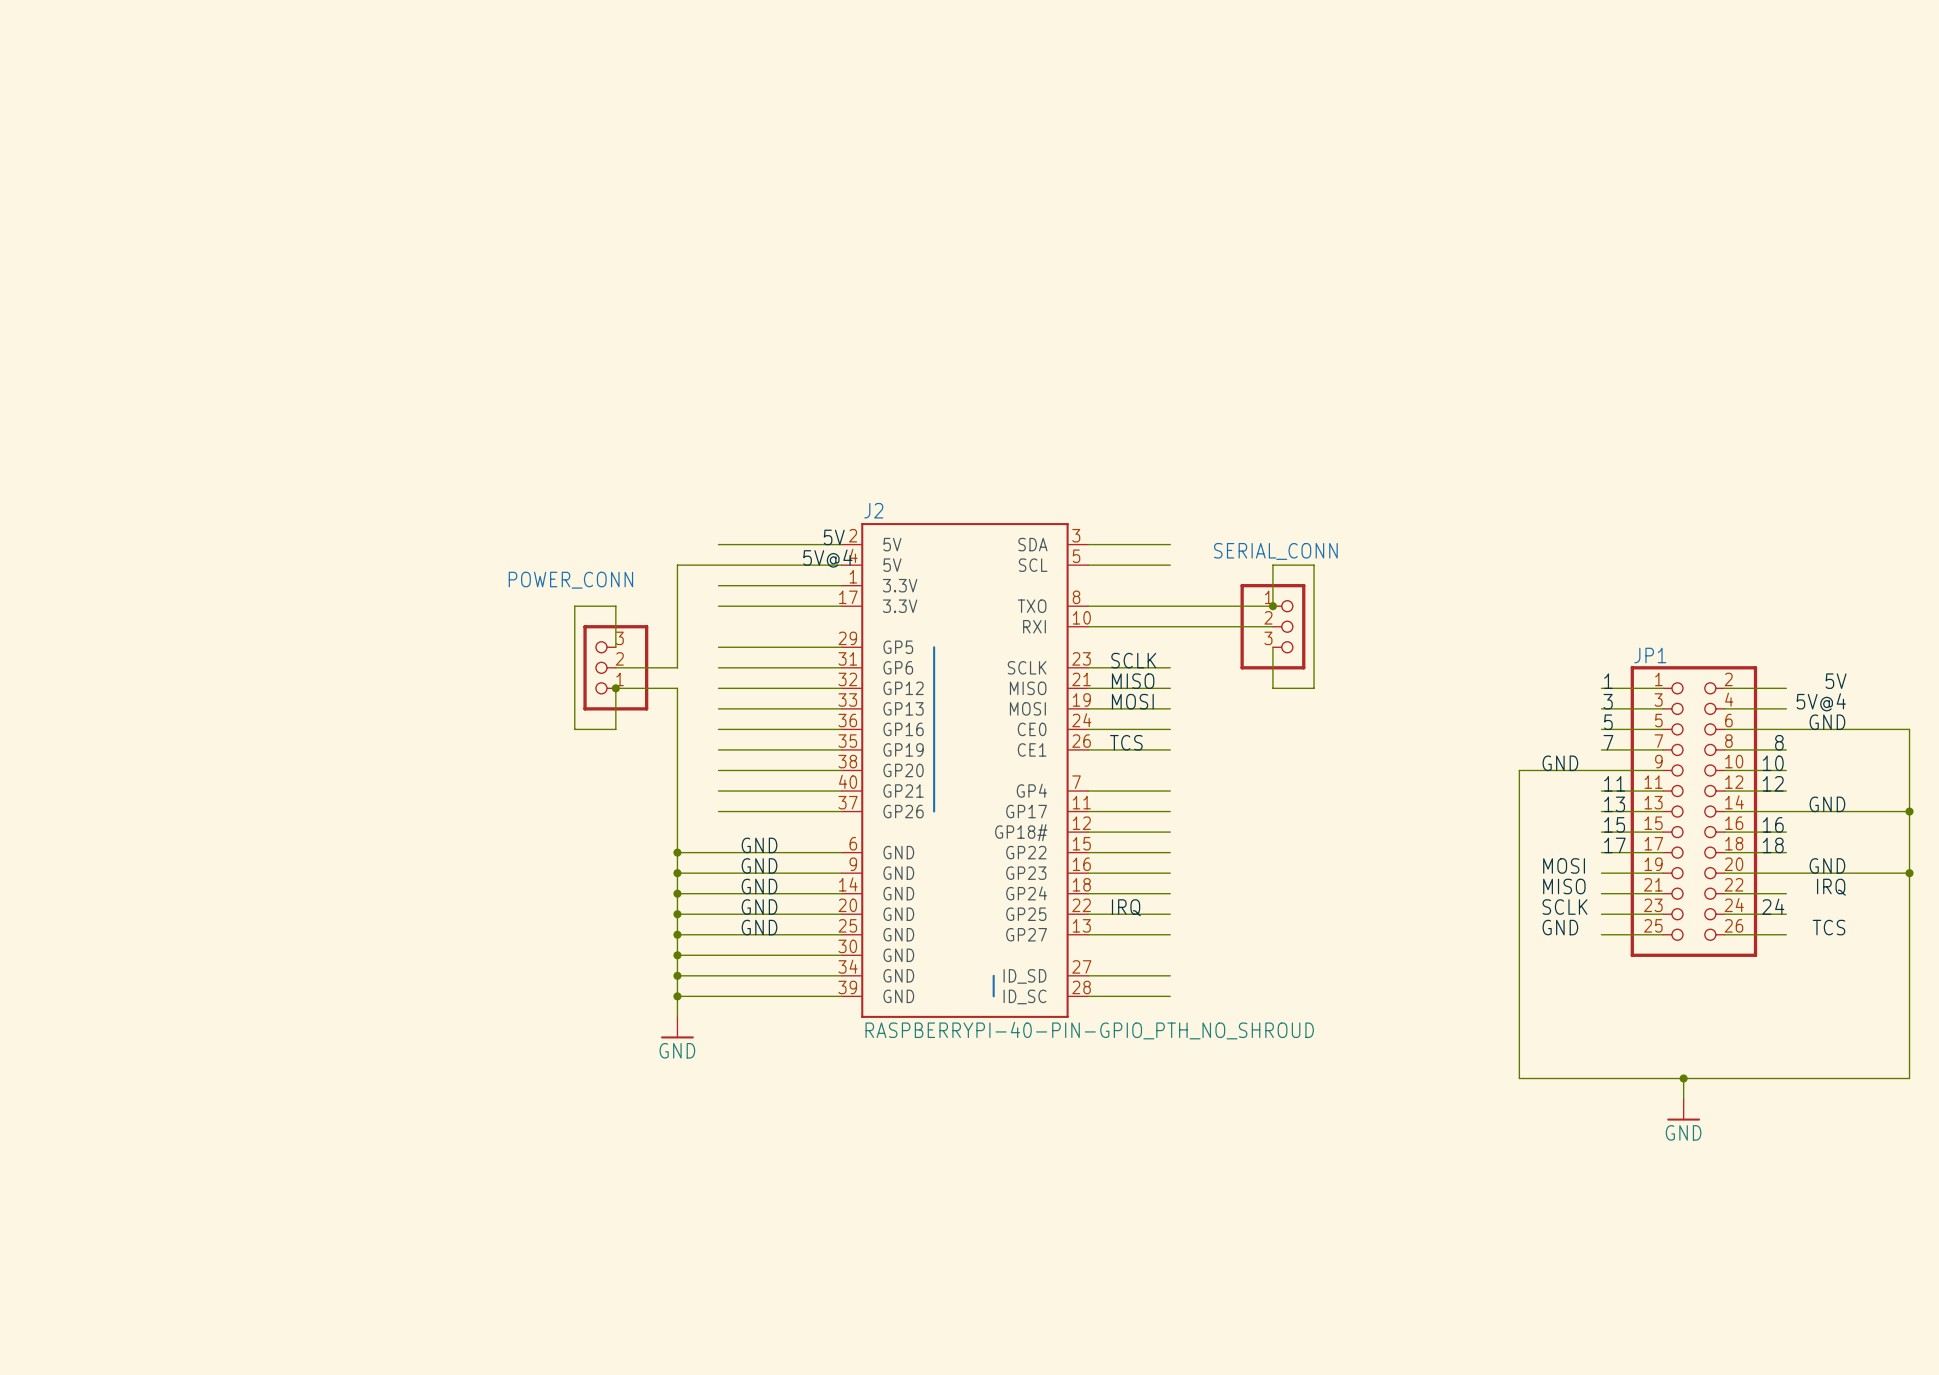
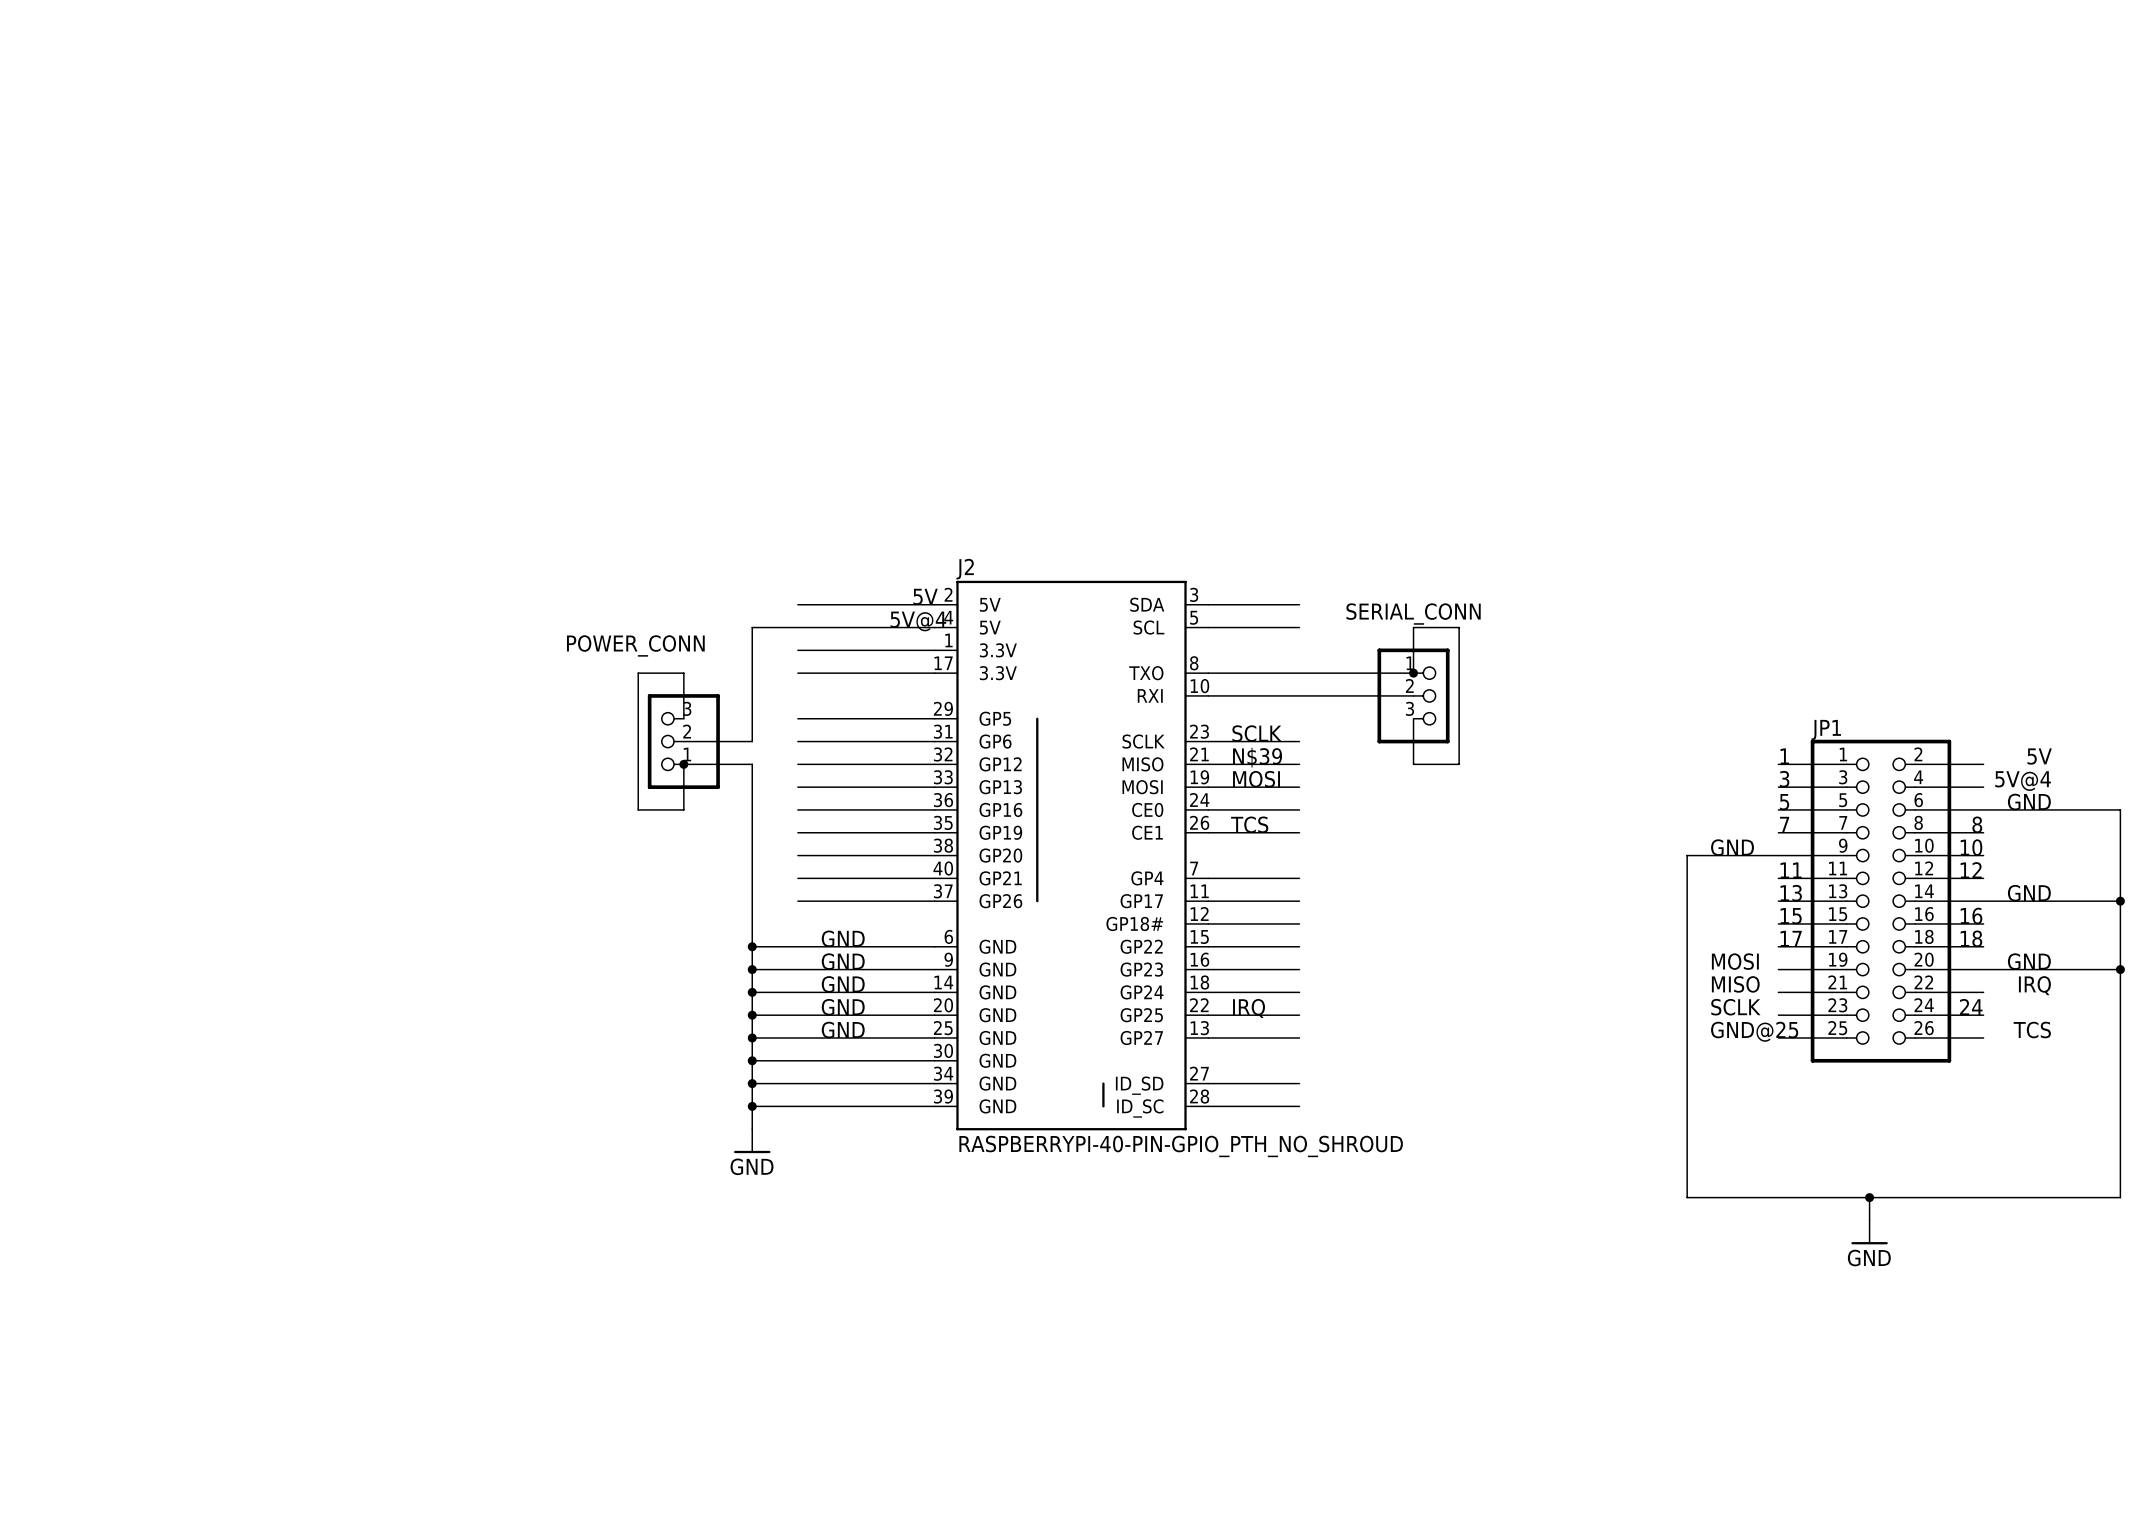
label: MISO (1133, 681) -> N$39 (1257, 757)
label: GND (1560, 927) -> GND@25 (1754, 1031)

